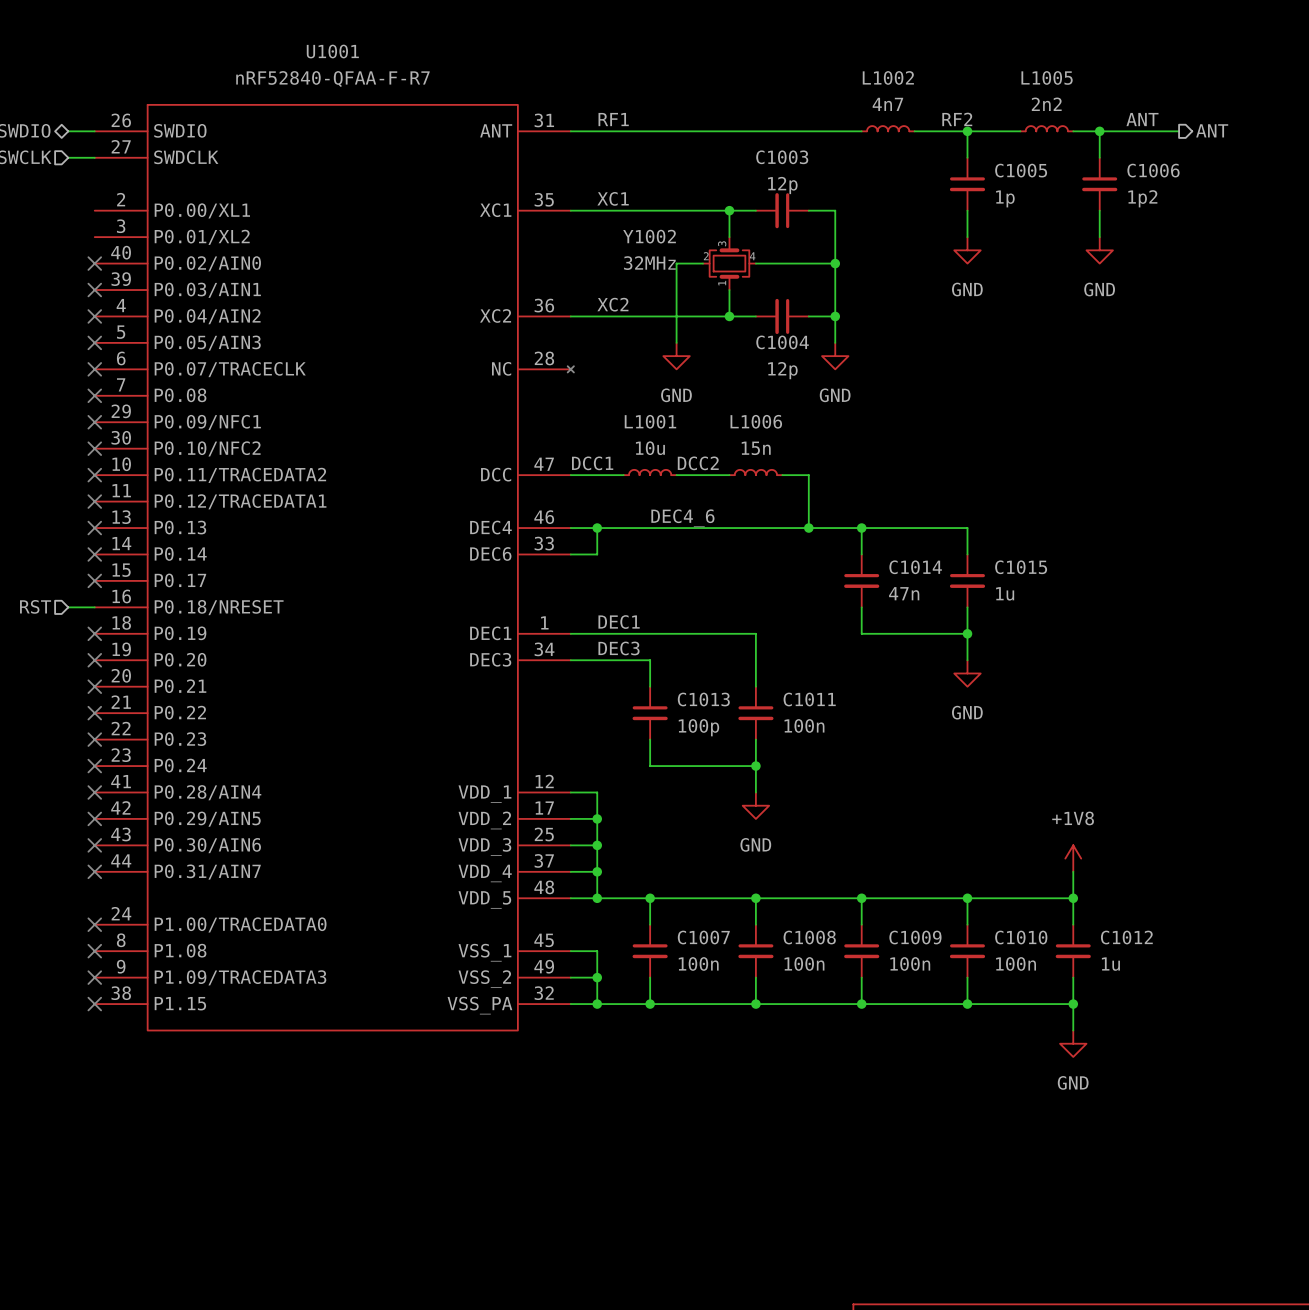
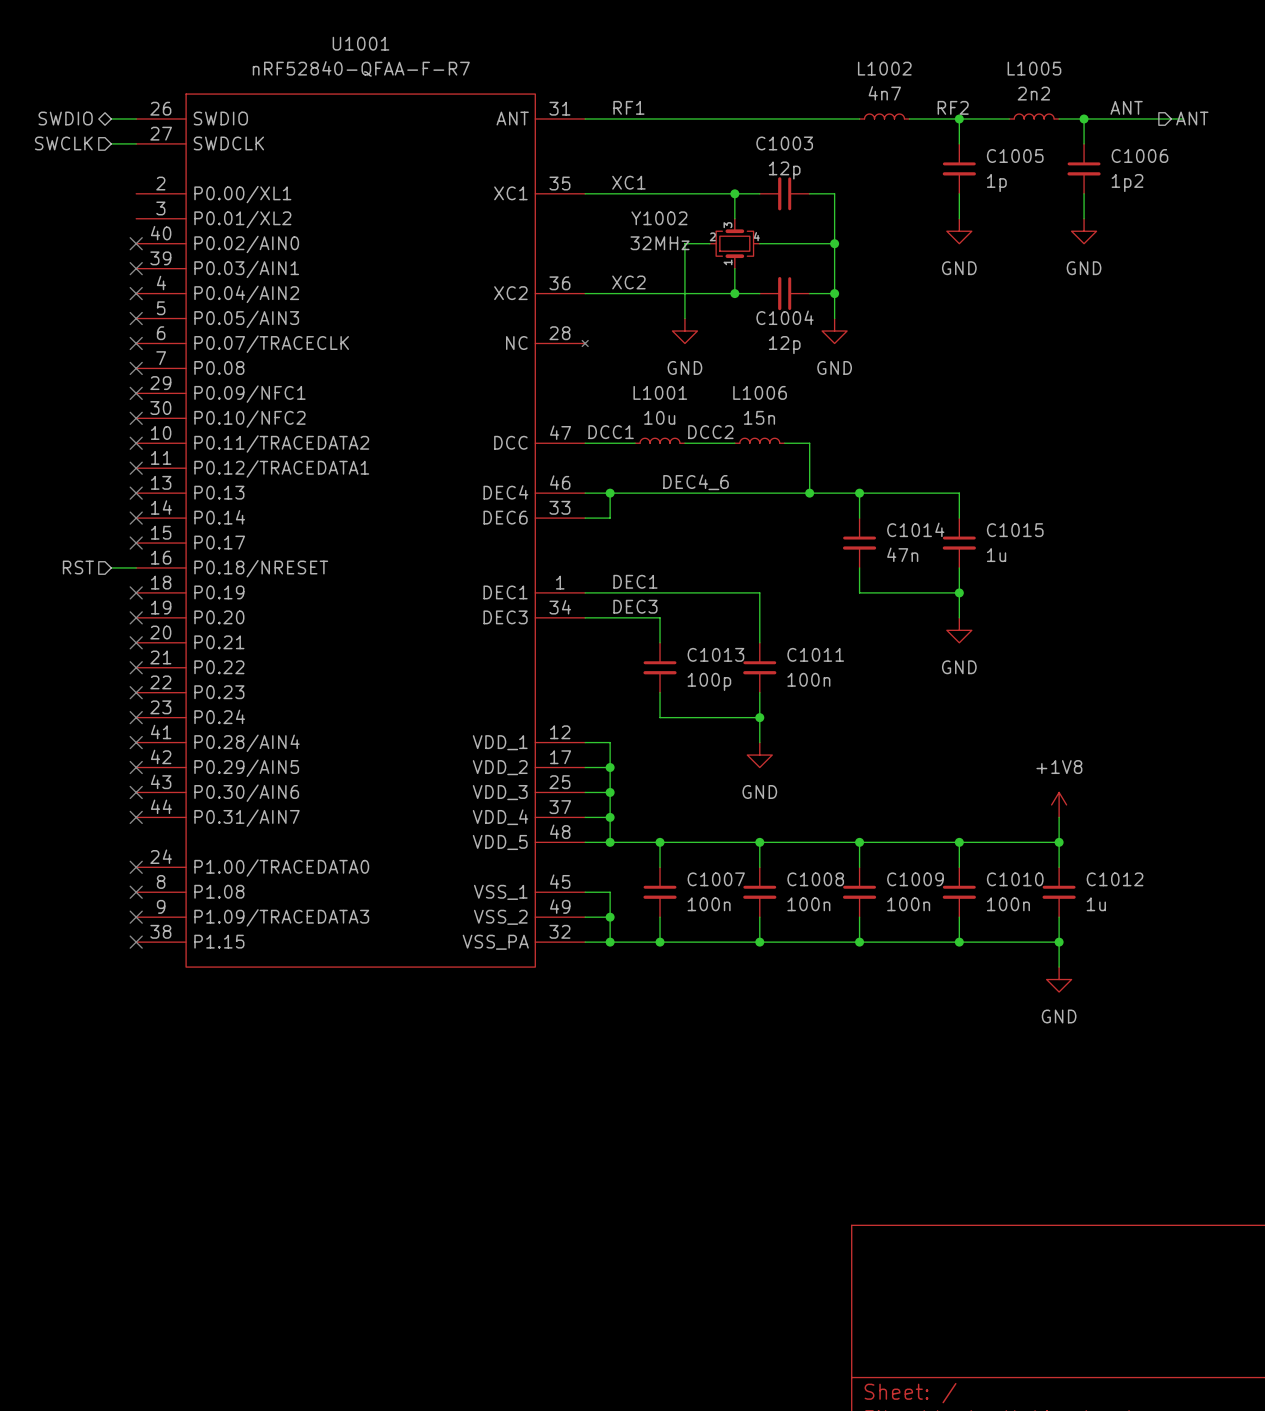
wire: none -> (1158, 118) (1183, 118)

